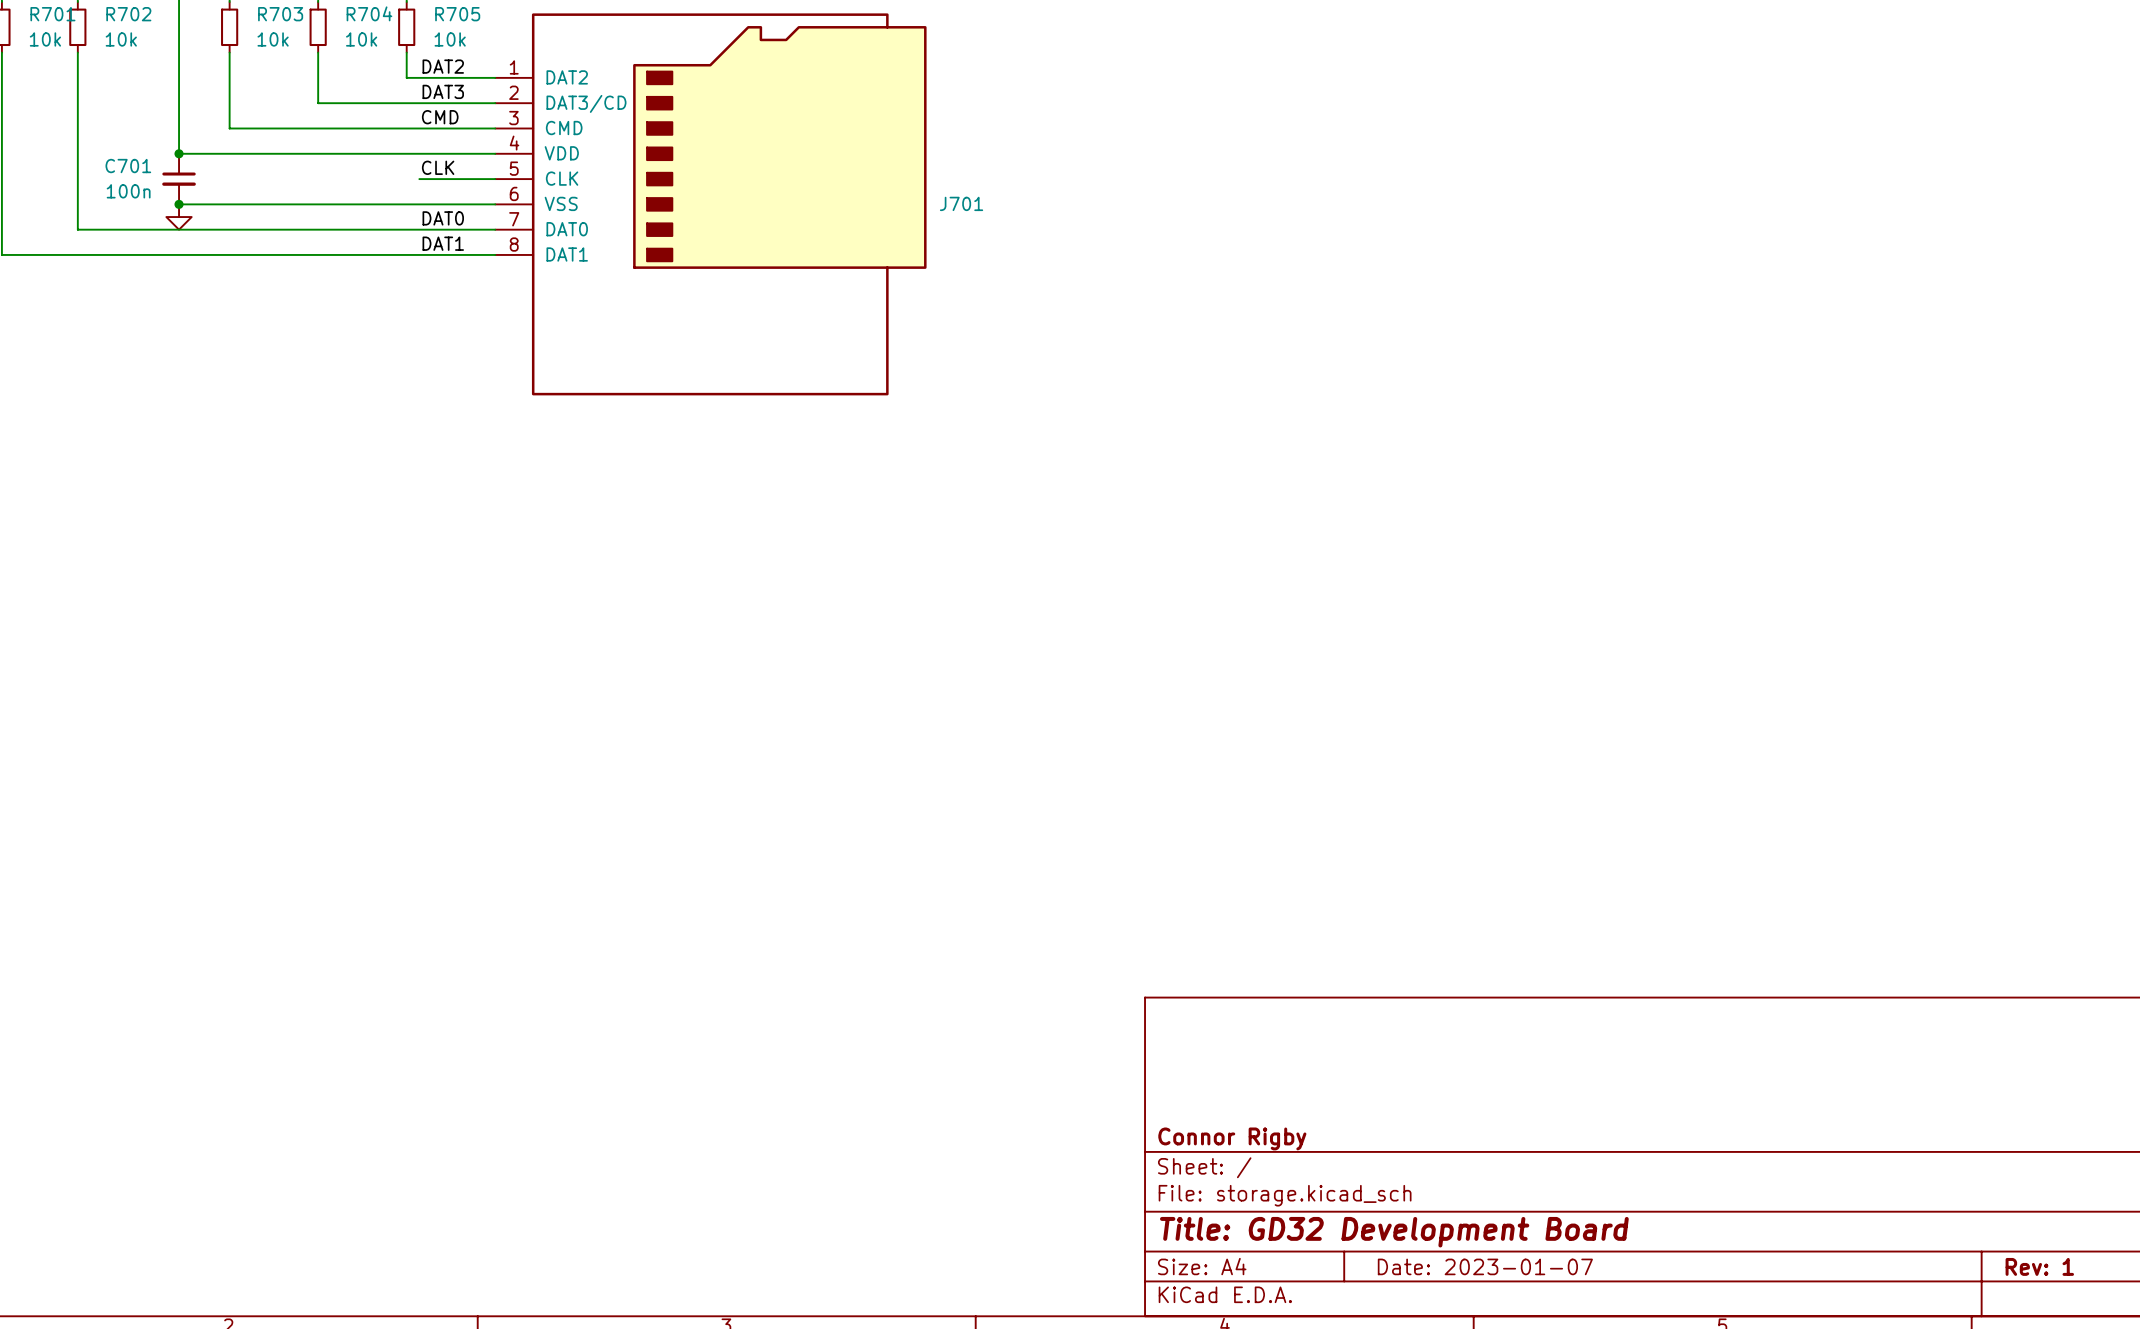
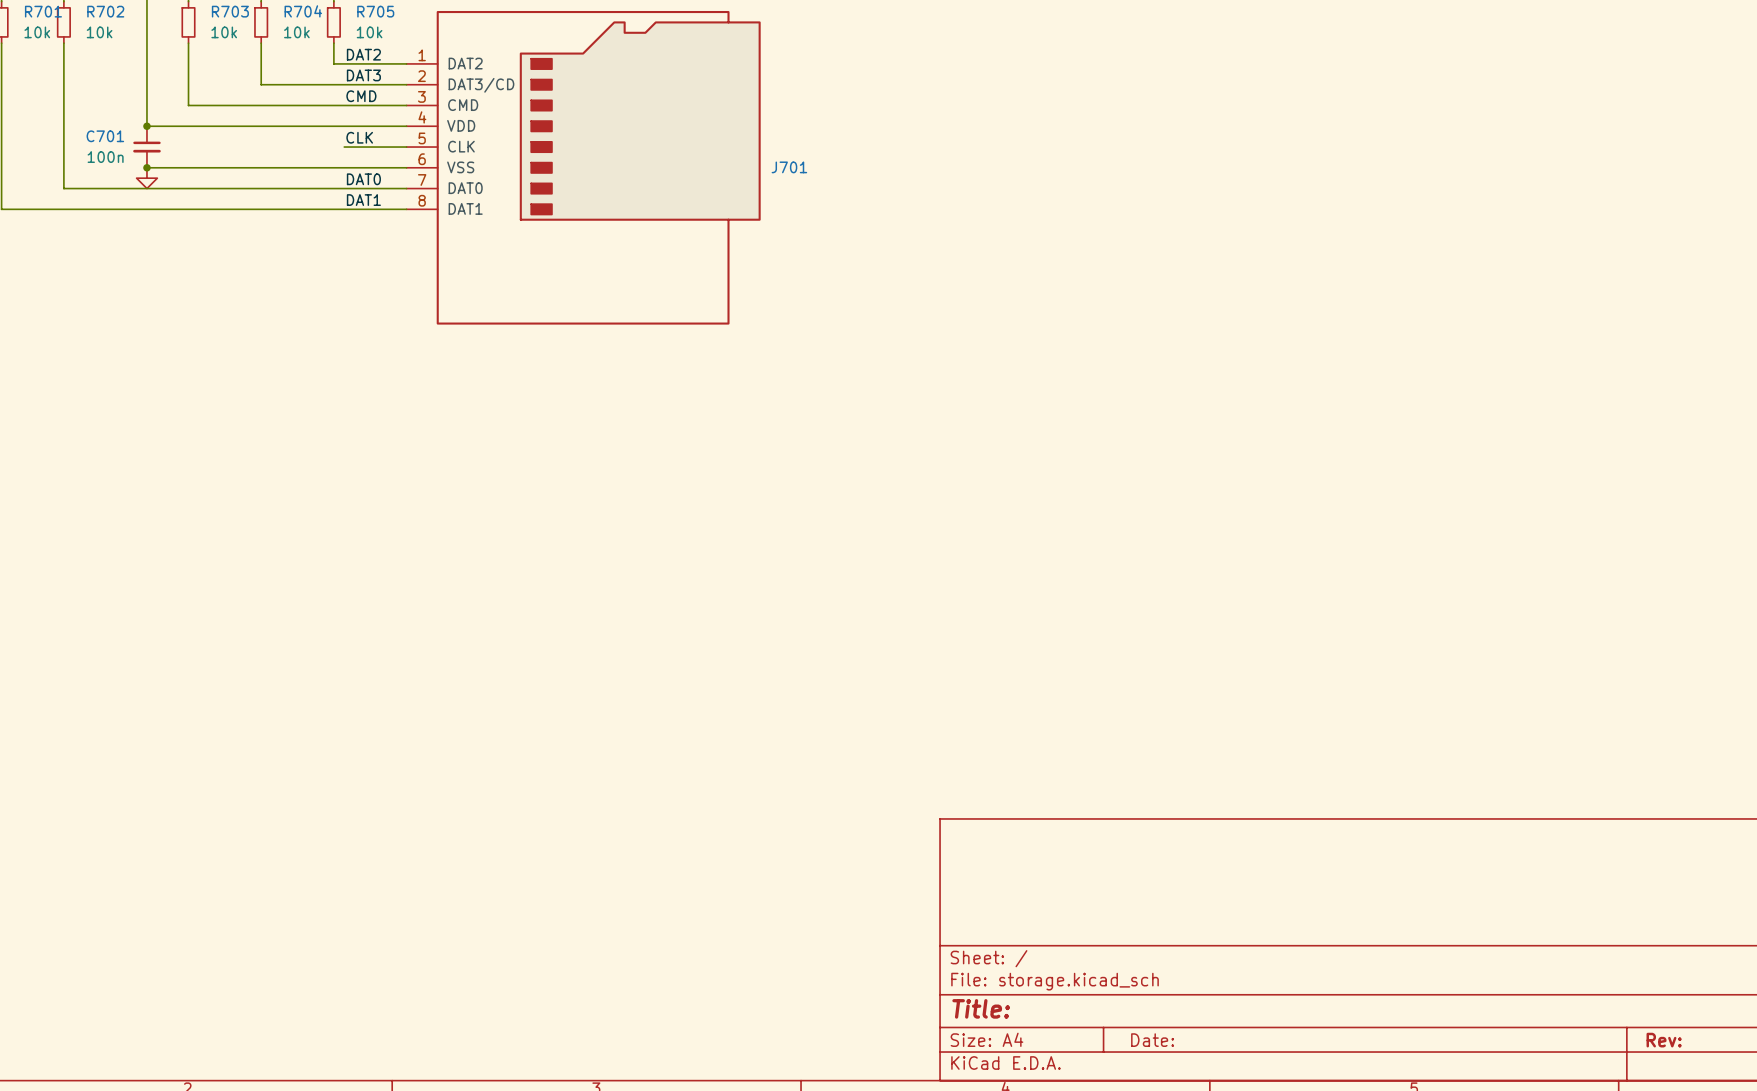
title block: Connor Rigby (1232, 1138) -> none
title block: Title: GD32 Development Board (1394, 1232) -> Title: (981, 1008)
title block: Date: 2023-01-07 (1485, 1266) -> Date: (1152, 1040)
title block: Rev: 1 (2039, 1266) -> Rev: (1664, 1040)

